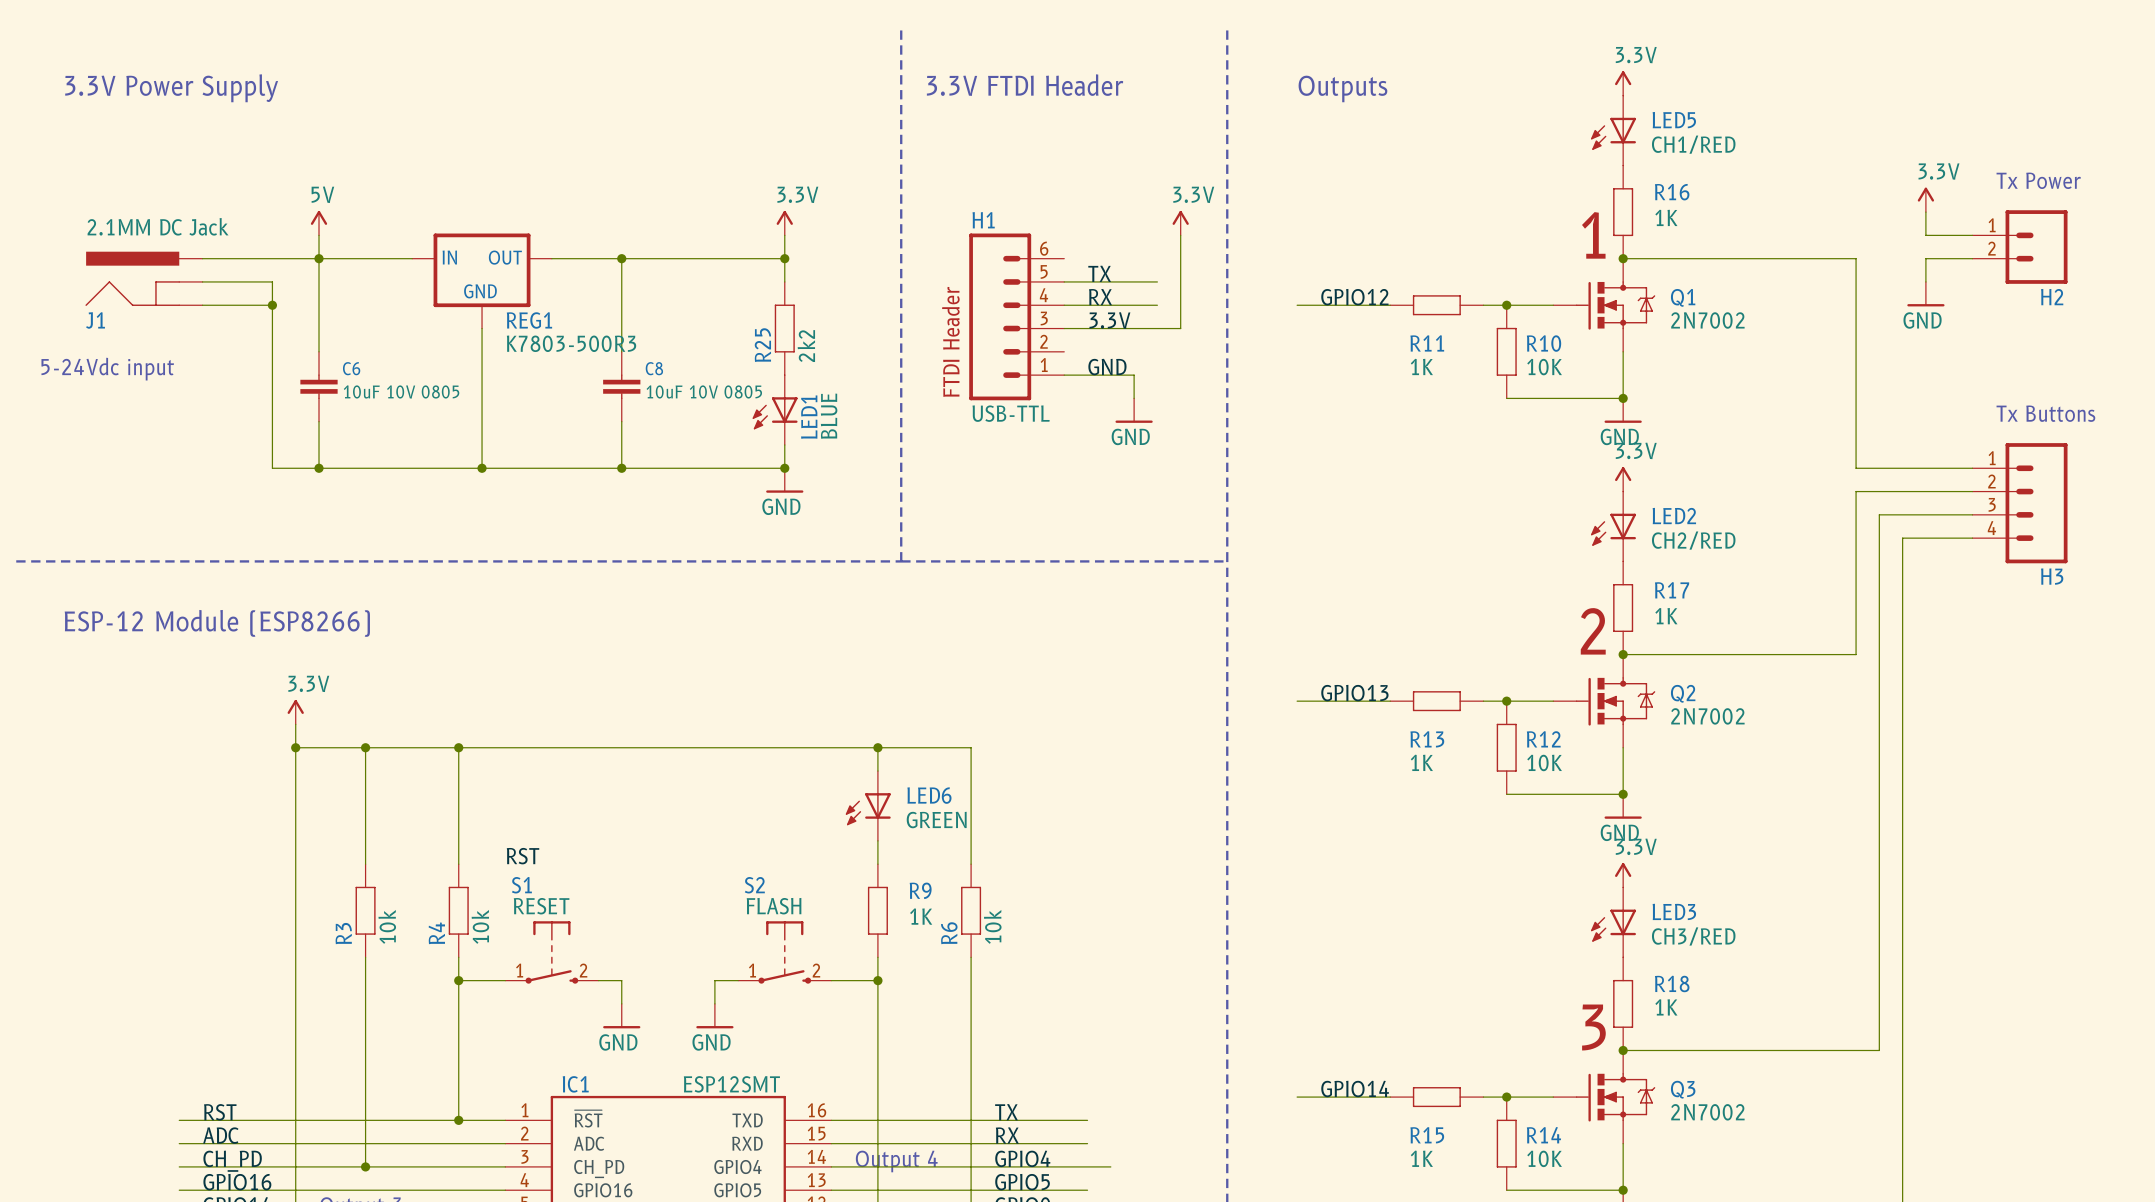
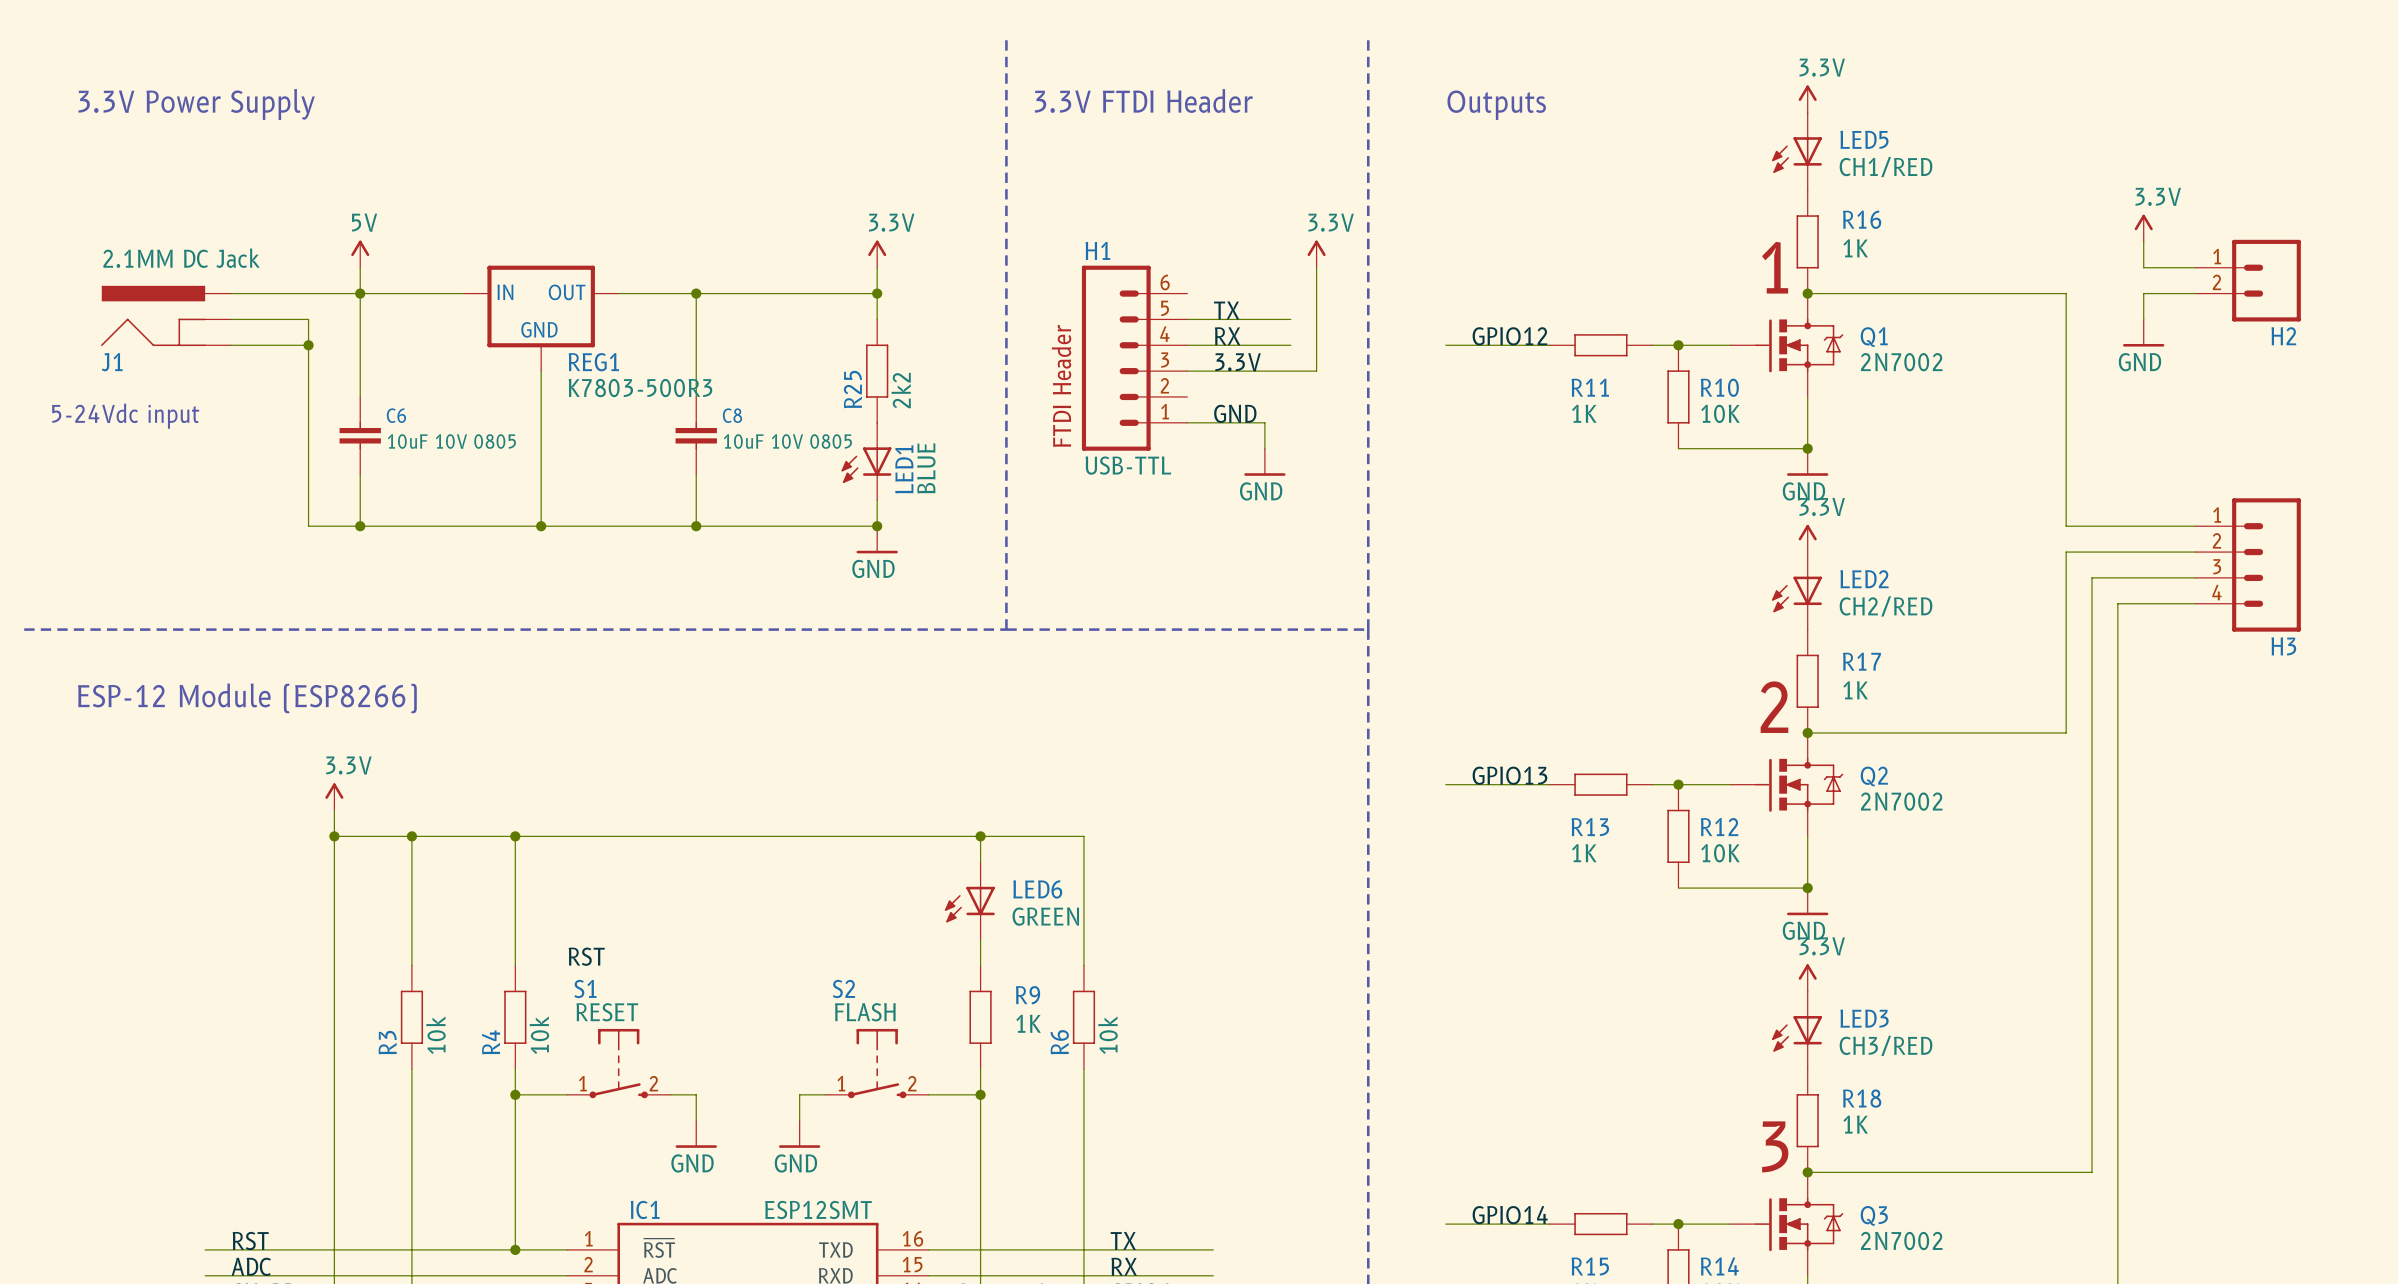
text: Tx Power (2038, 180) -> none
text: Tx Buttons (2045, 413) -> none

